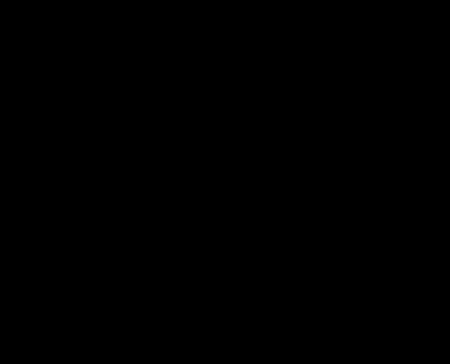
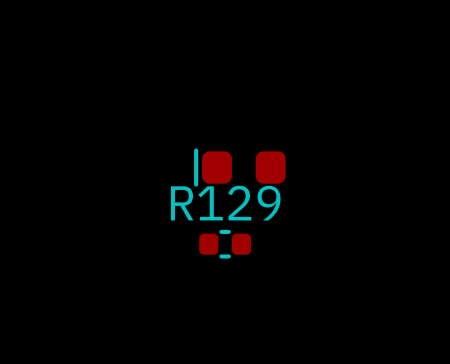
part: none -> (239, 167)
R129: none -> (225, 244)

